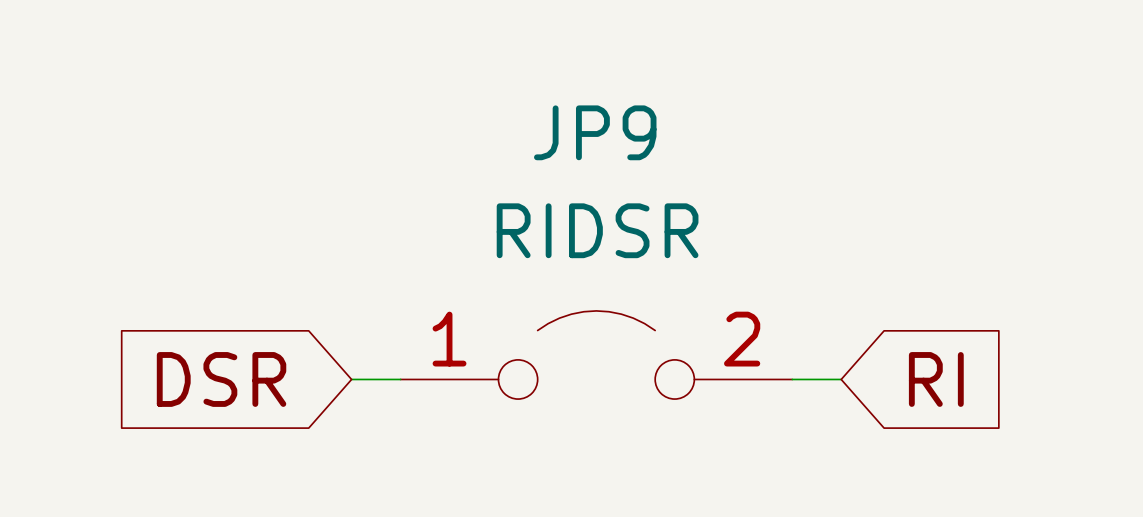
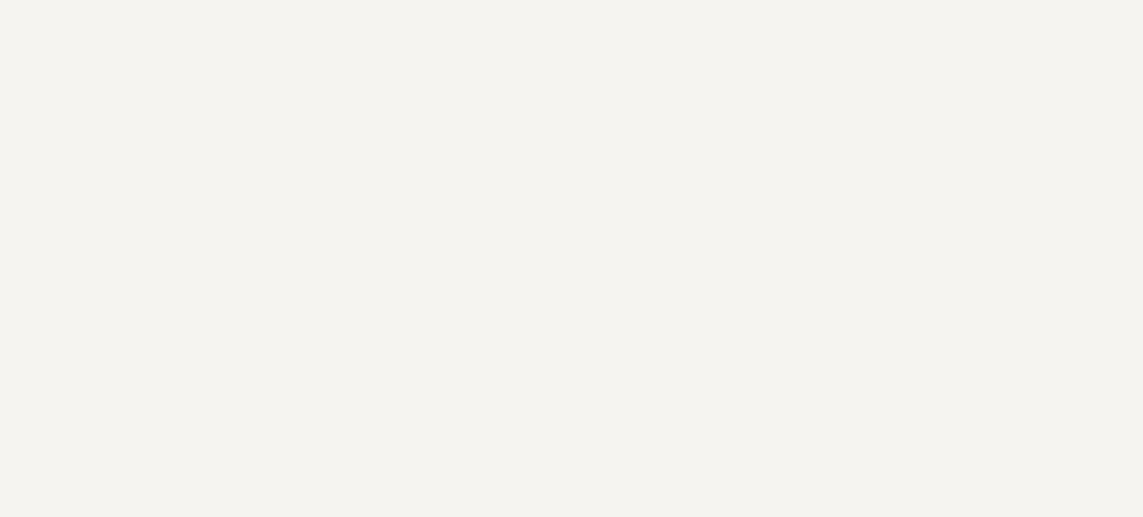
JP9: RIDSR (596, 354) -> none
global label: DSR (221, 379) -> none
wire: (351, 379) (400, 379) -> none
wire: (792, 379) (841, 379) -> none
global label: RI (936, 379) -> none

